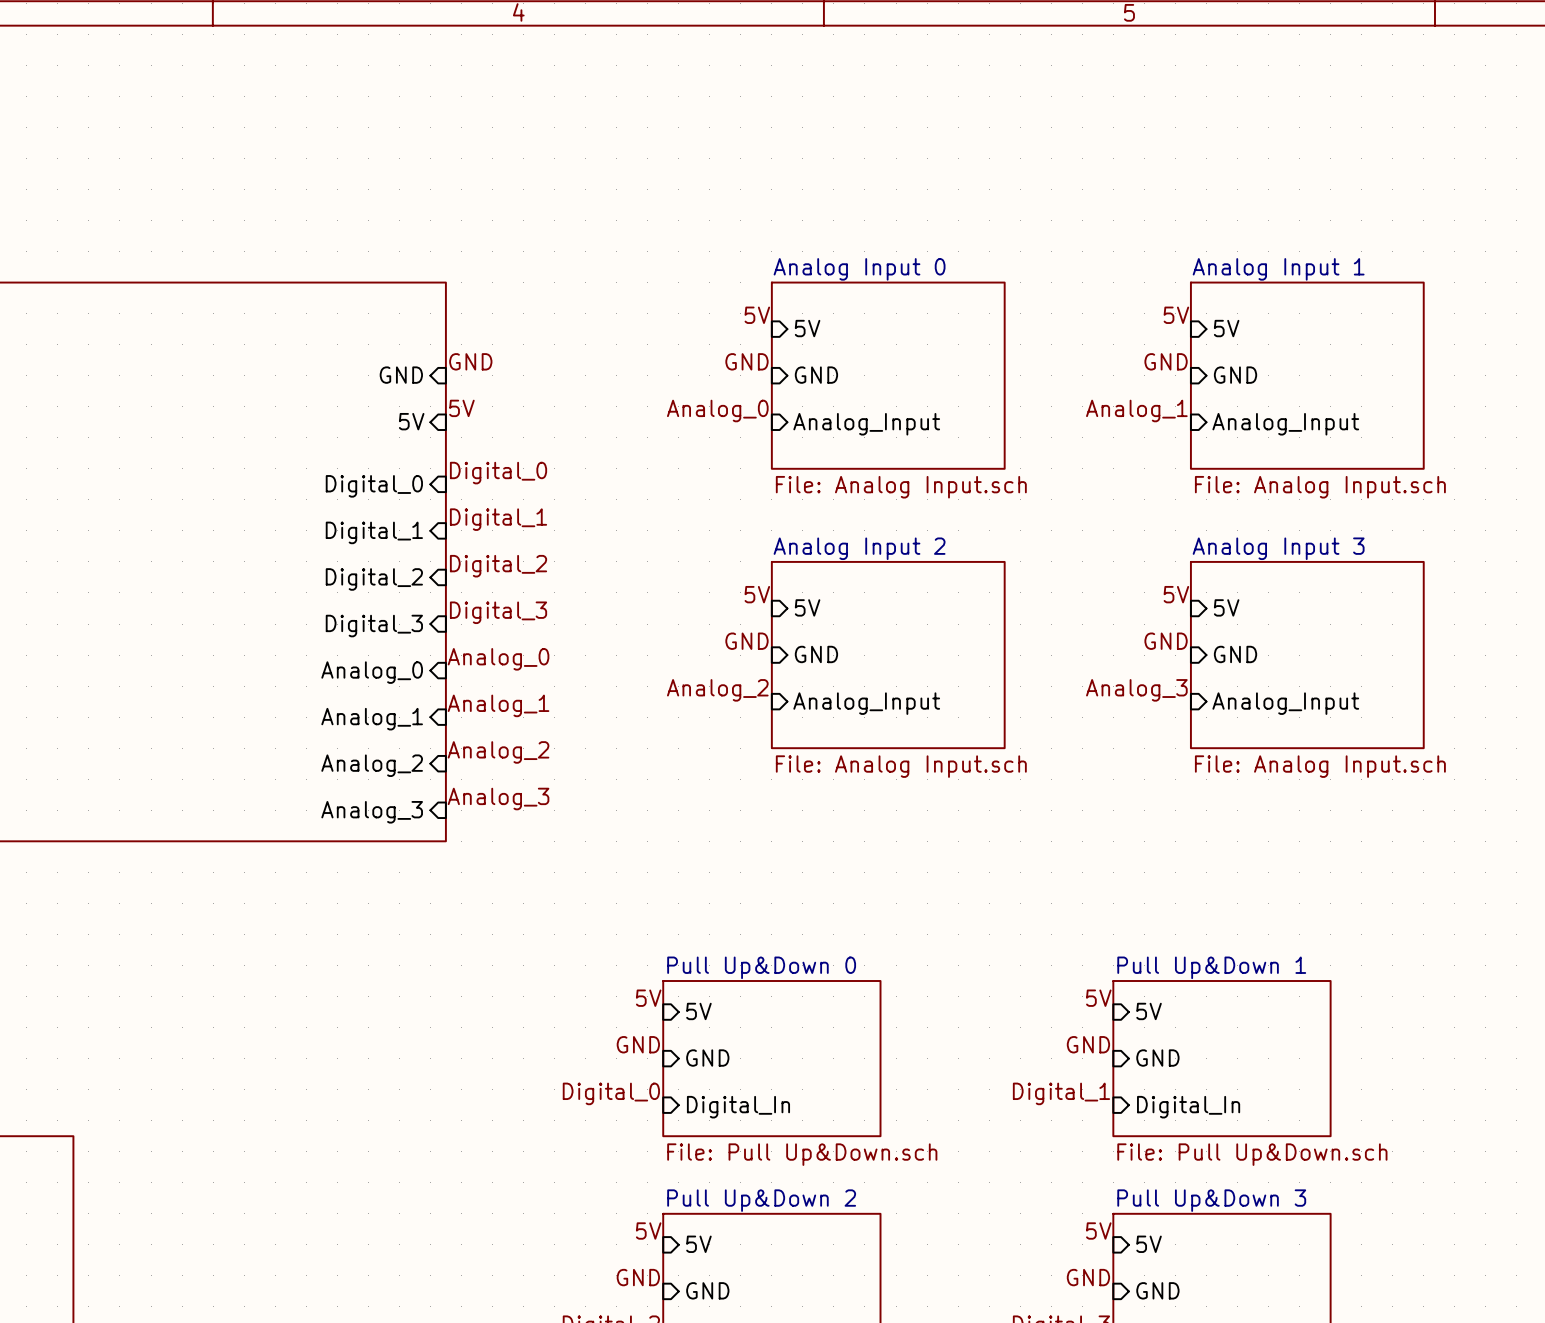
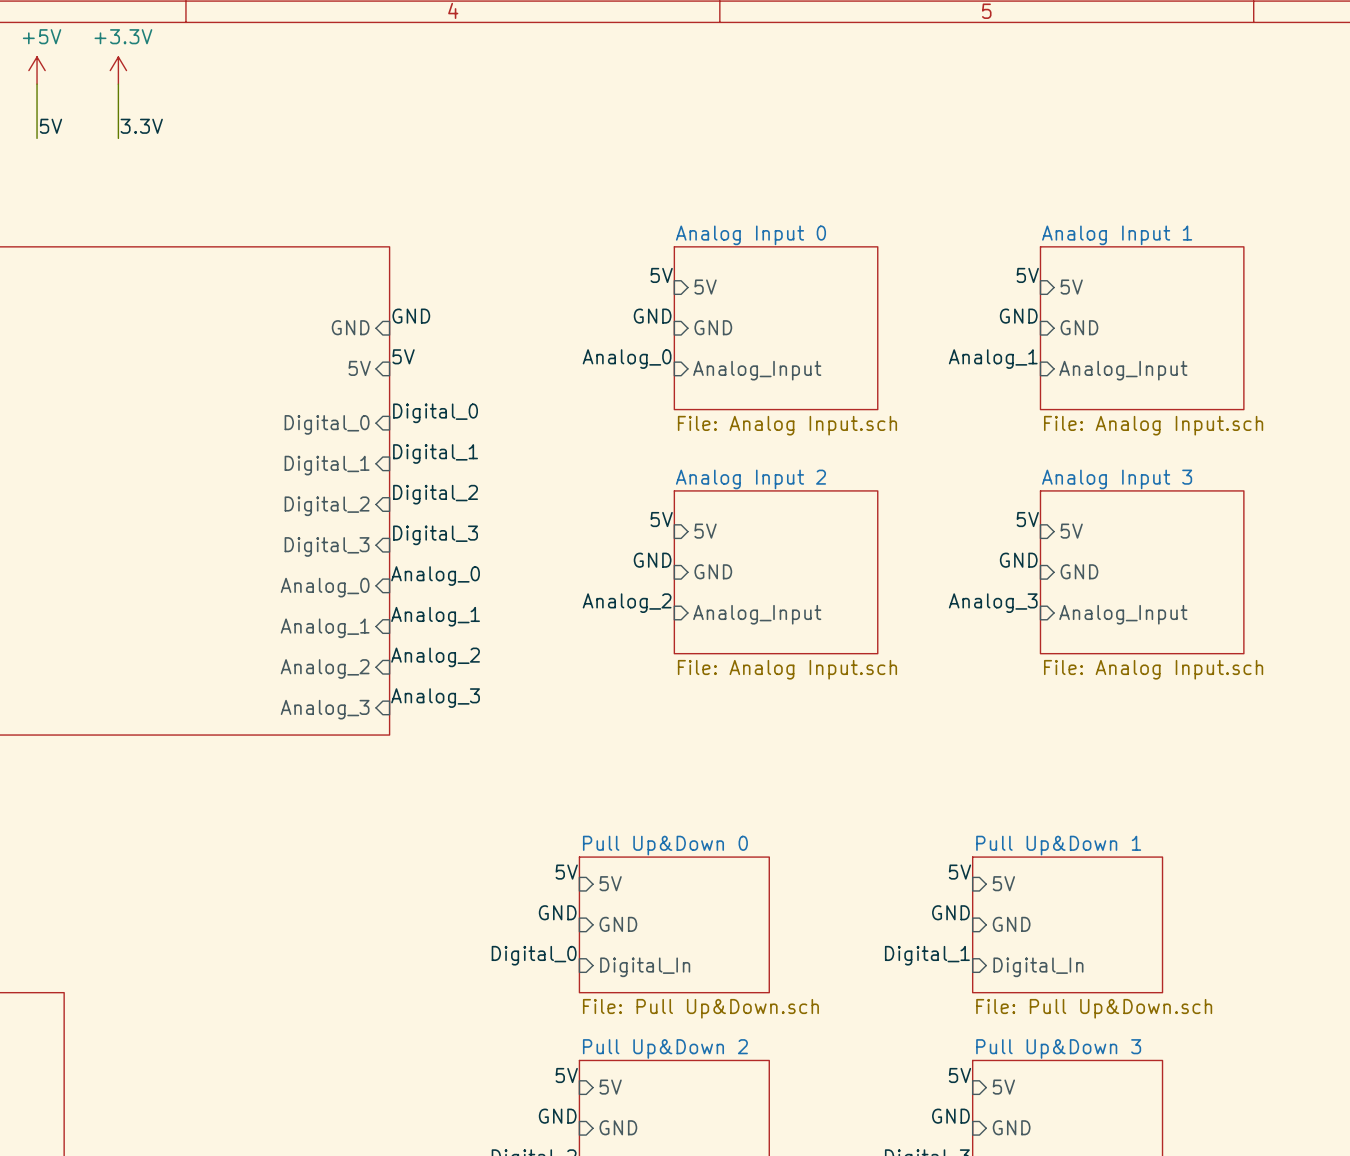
power symbol: none -> +5V (37, 70)
power symbol: none -> +3.3V (118, 70)
wire: none -> (37, 84) (37, 138)
wire: none -> (118, 84) (118, 138)
label: none -> 5V (51, 126)
label: none -> 3.3V (141, 126)

